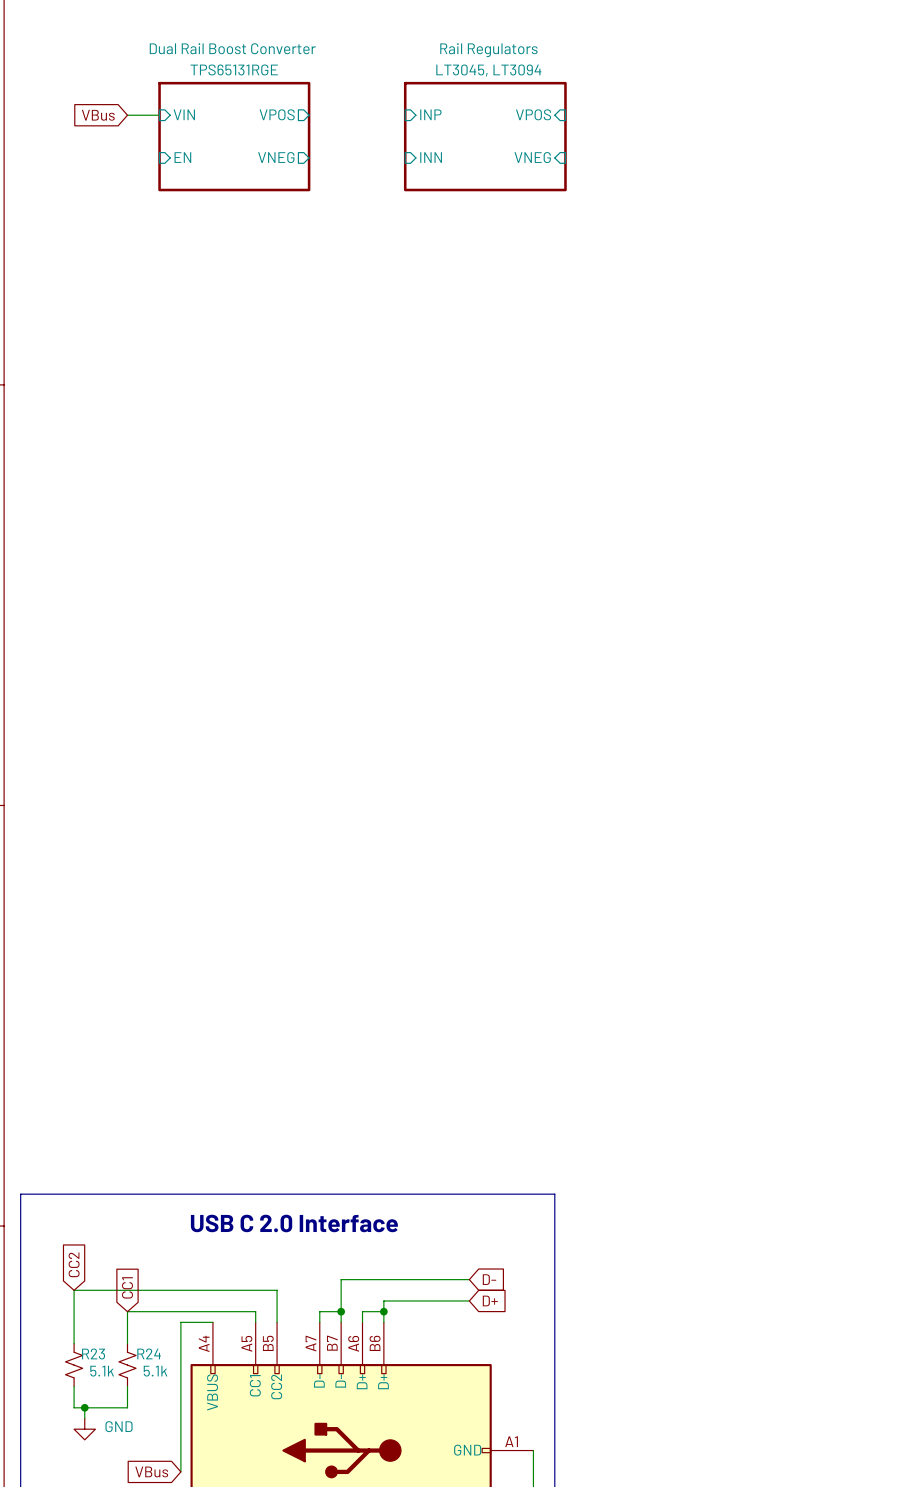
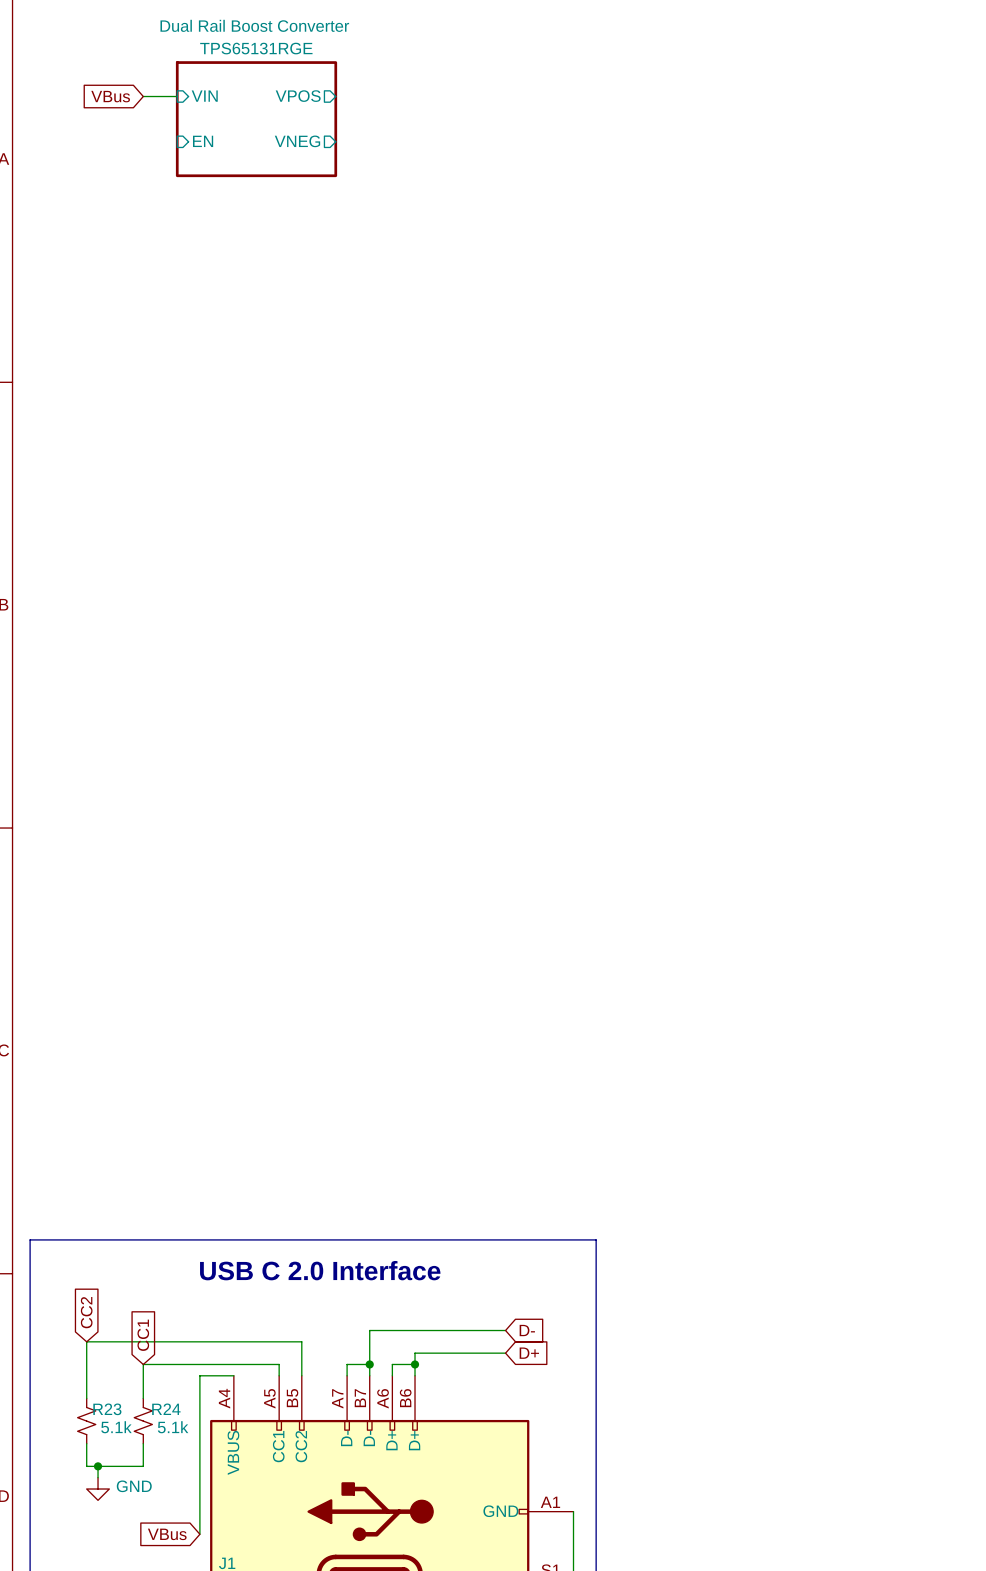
sheet pin: INP (430, 114) -> none
sheet pin: VPOS (533, 114) -> none
sheet Rail Regulators: (485, 136) -> none
sheet pin: INN (431, 157) -> none
sheet pin: VNEG (532, 157) -> none

